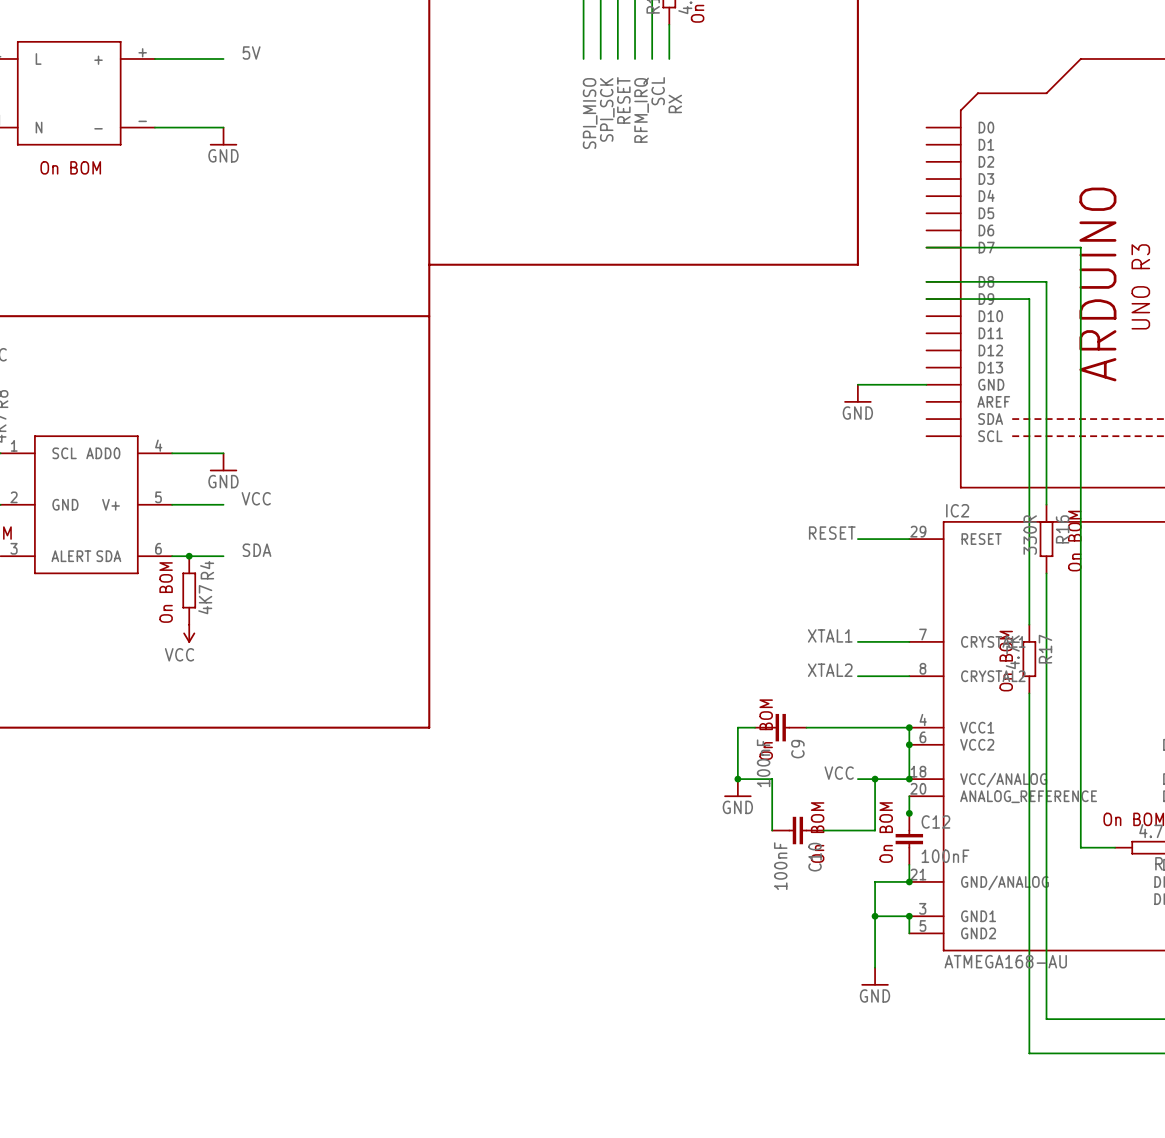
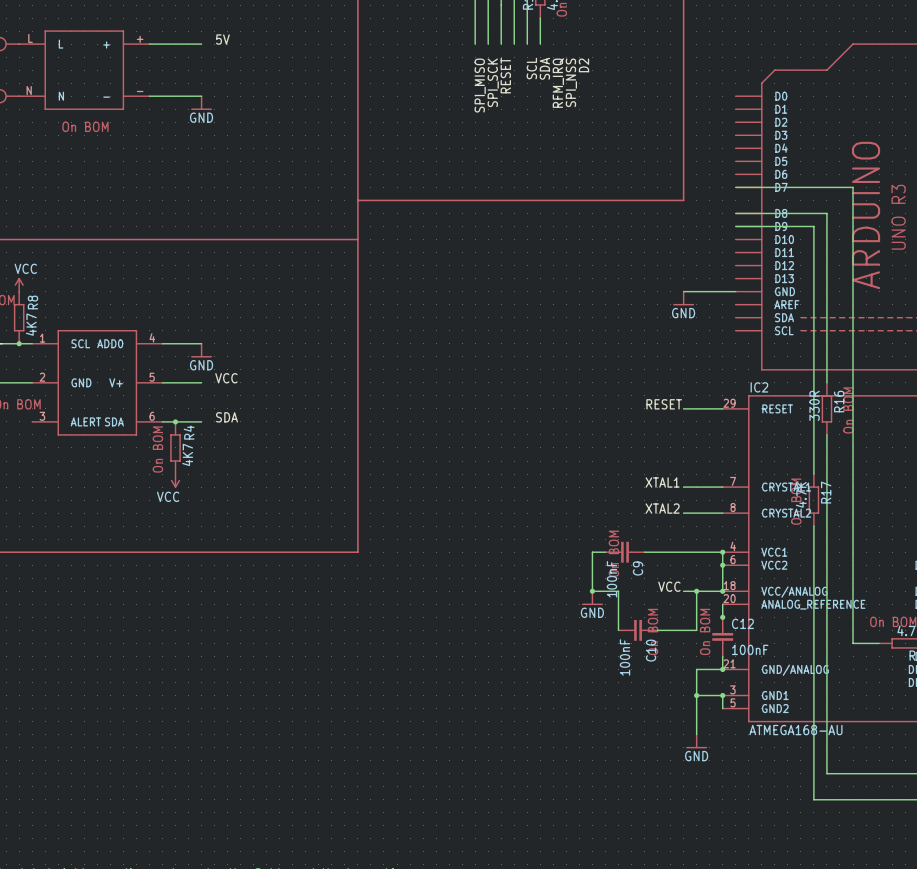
label: none -> D2 (583, 65)
label: none -> SDA (544, 68)
label: RX (675, 103) -> none
label: none -> SPI_NSS (571, 82)
label position: RFM_IRQ (641, 110) -> RFM_IRQ (558, 83)

